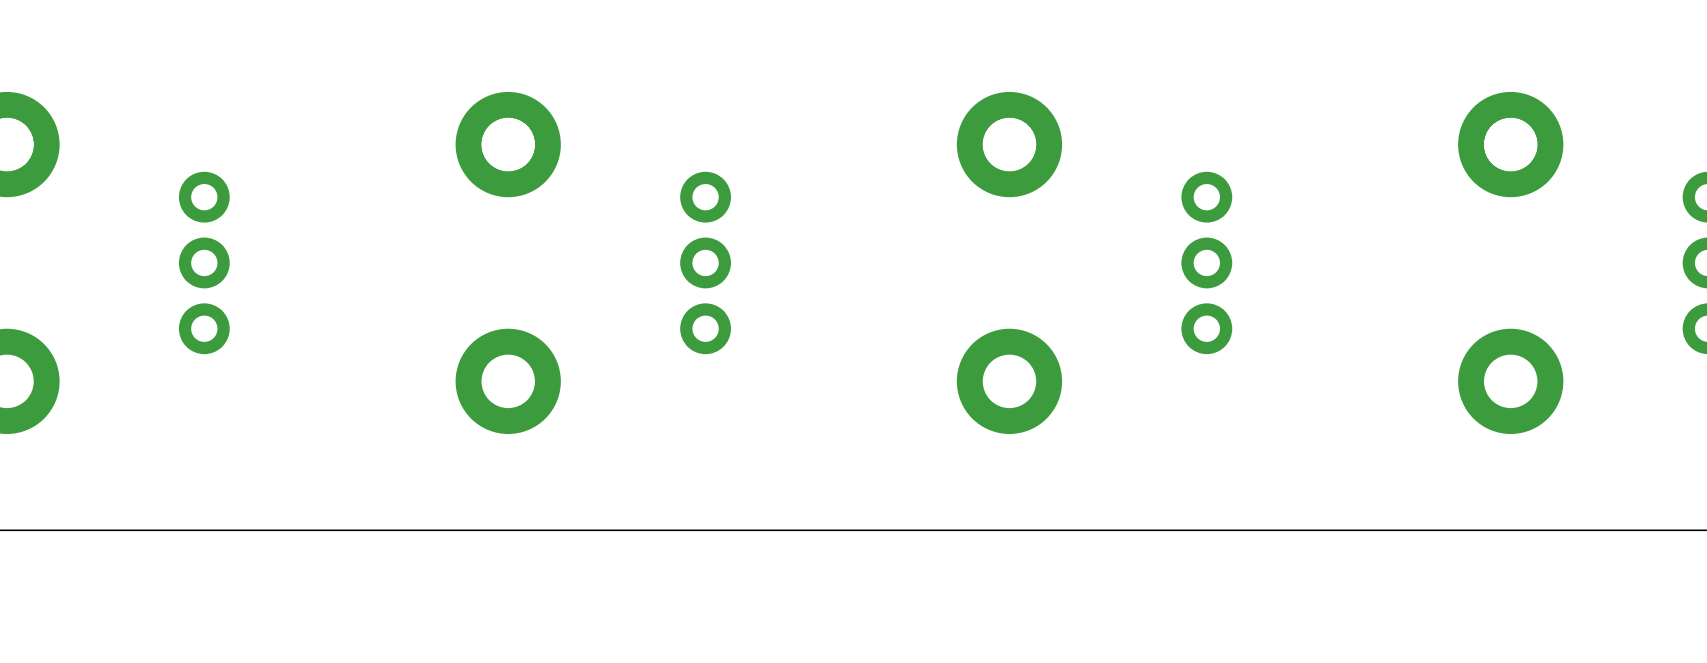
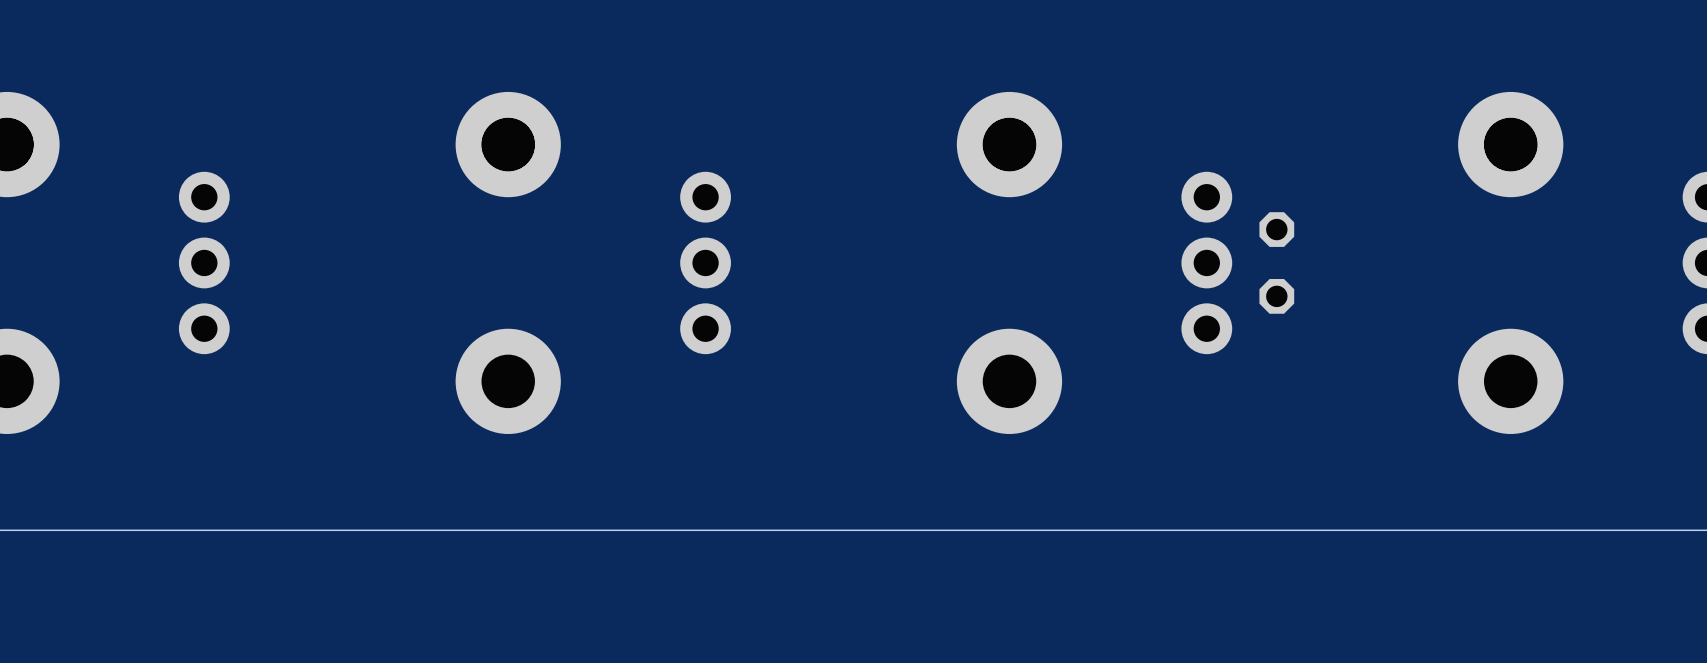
part: none -> (1276, 262)

